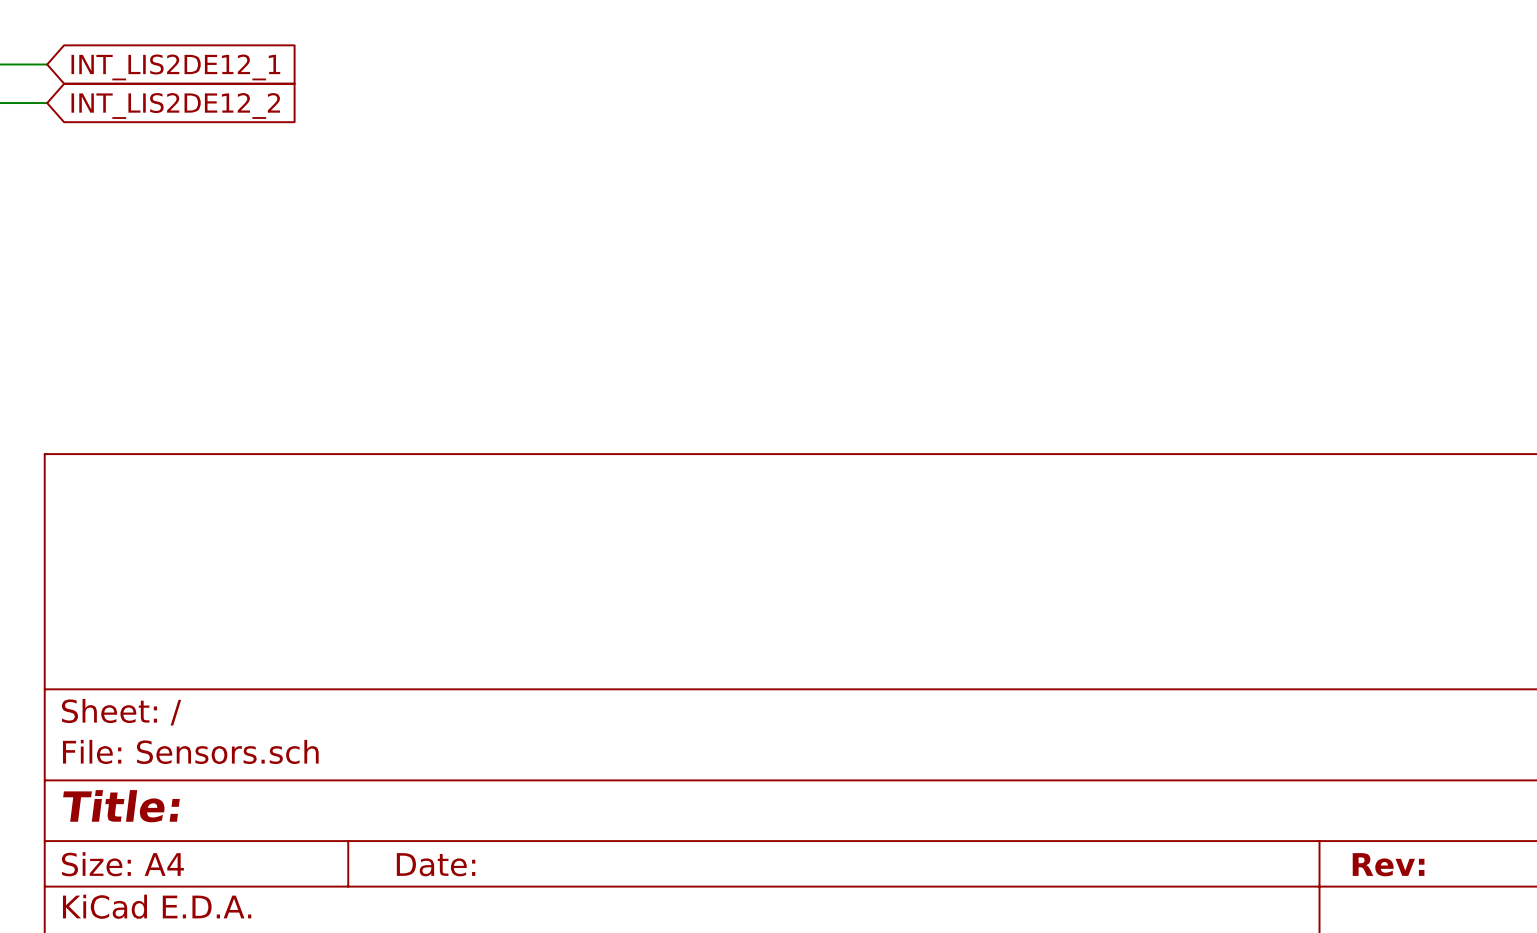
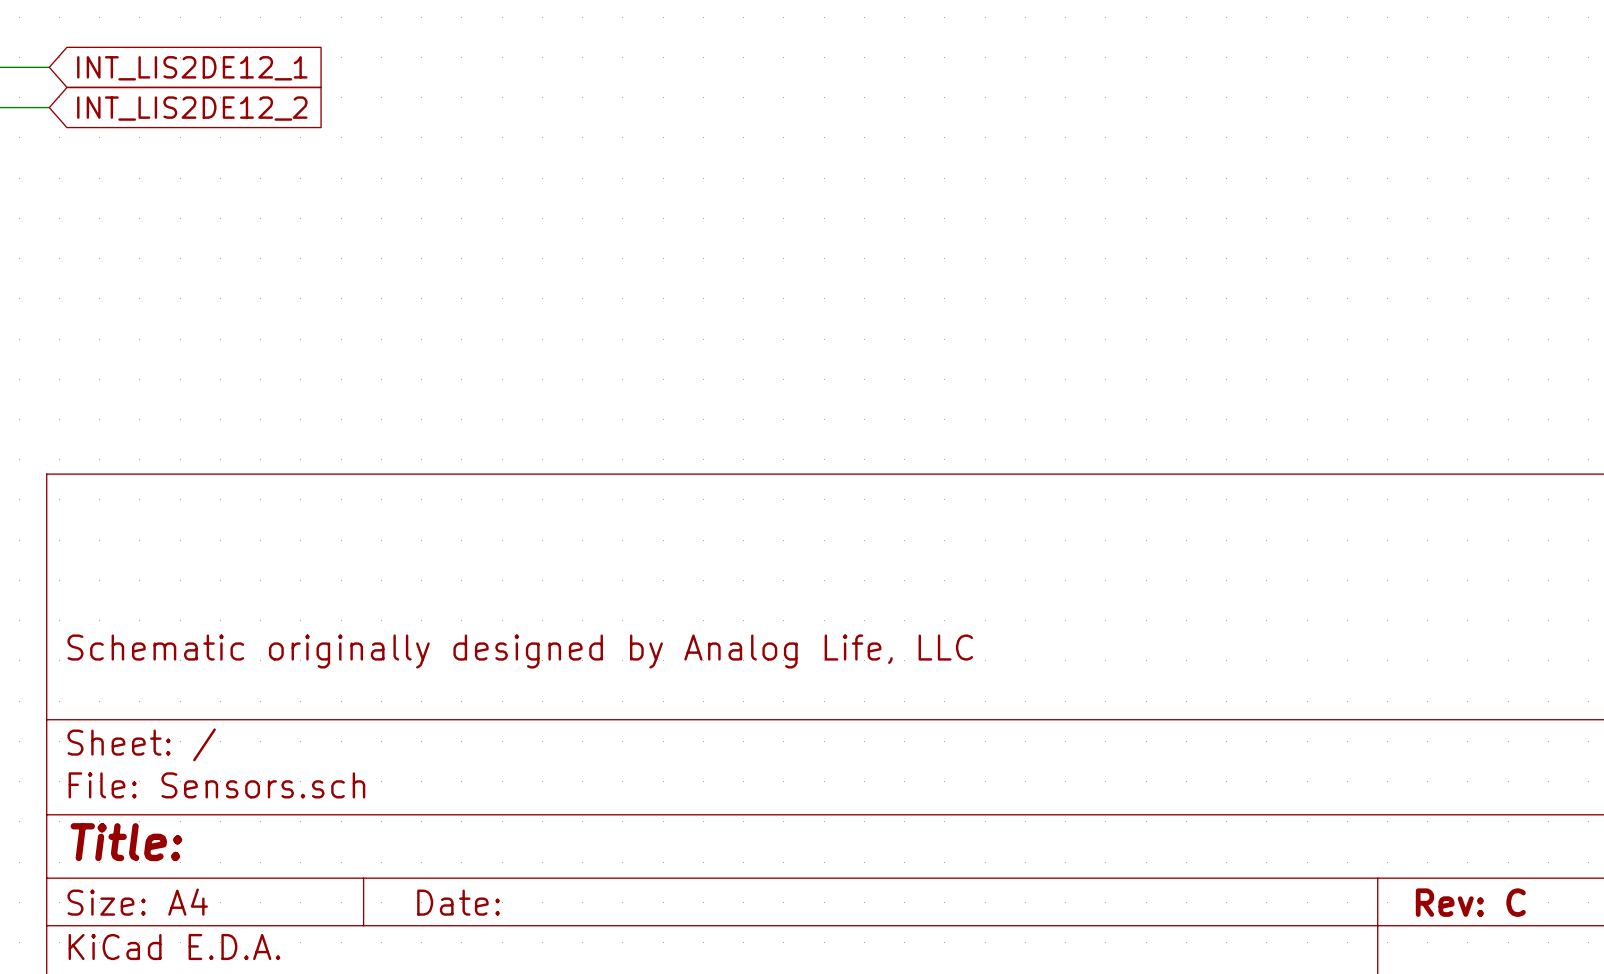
title block: none -> Schematic originally designed by Analog Life, LLC (520, 651)
title block: Rev: (1388, 864) -> Rev: C (1470, 902)

